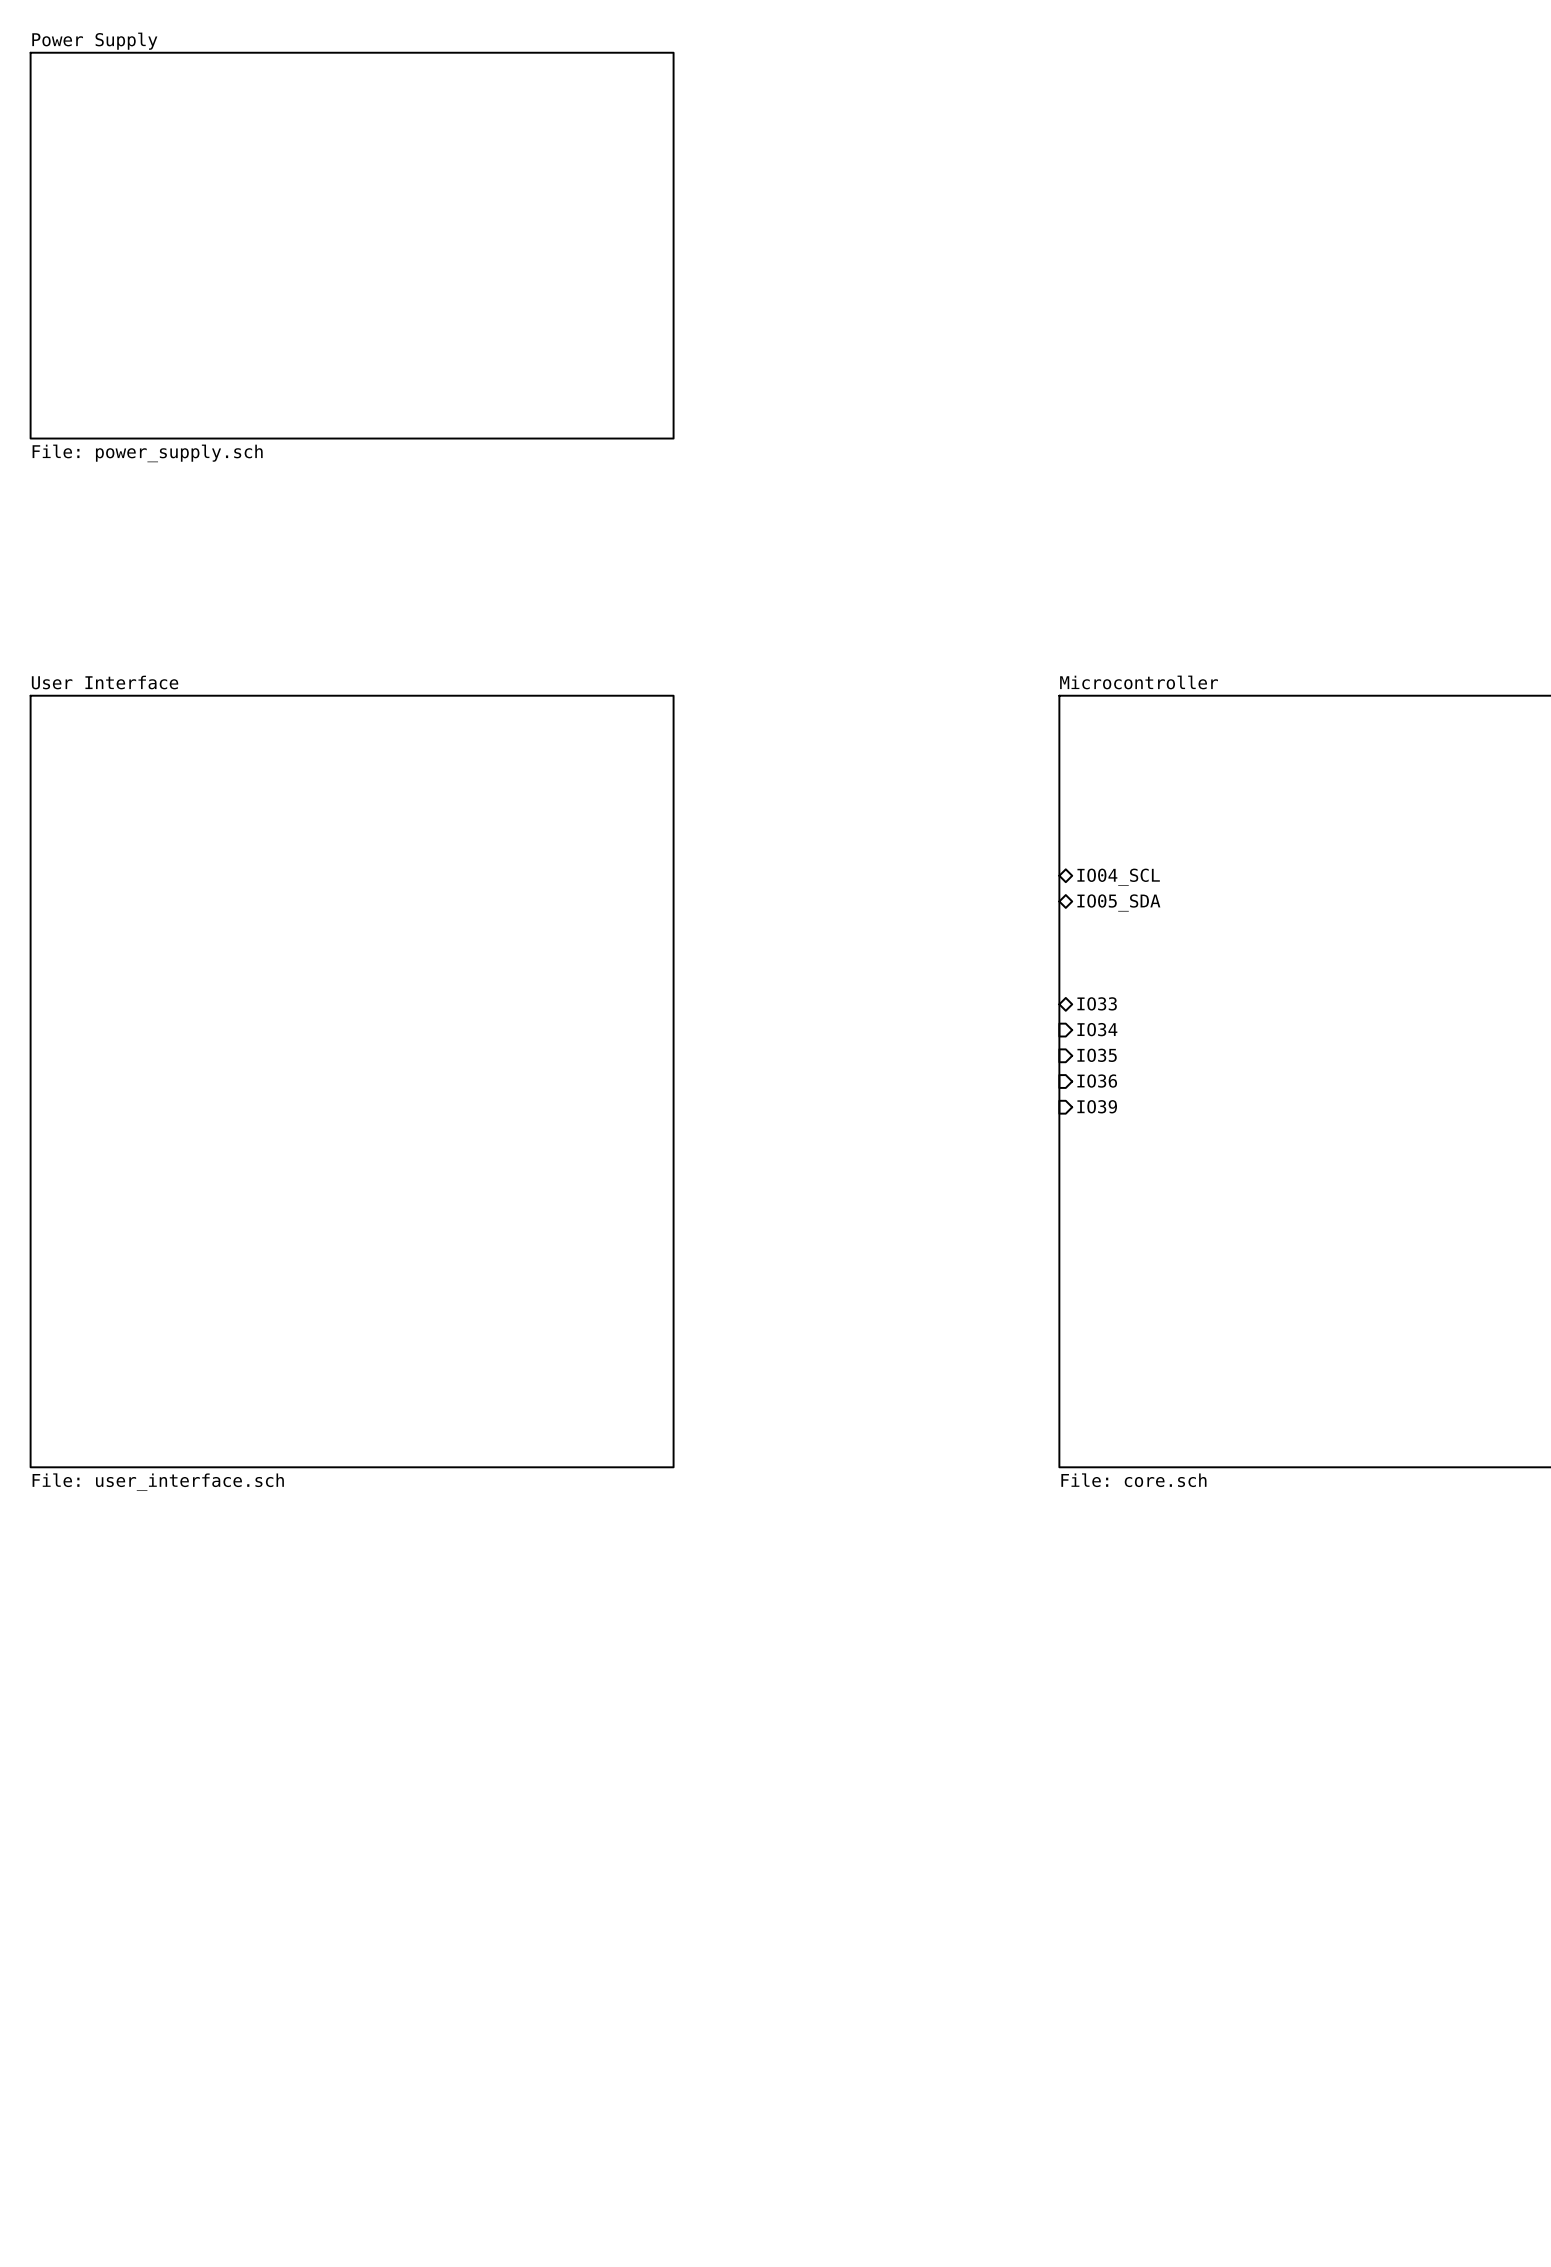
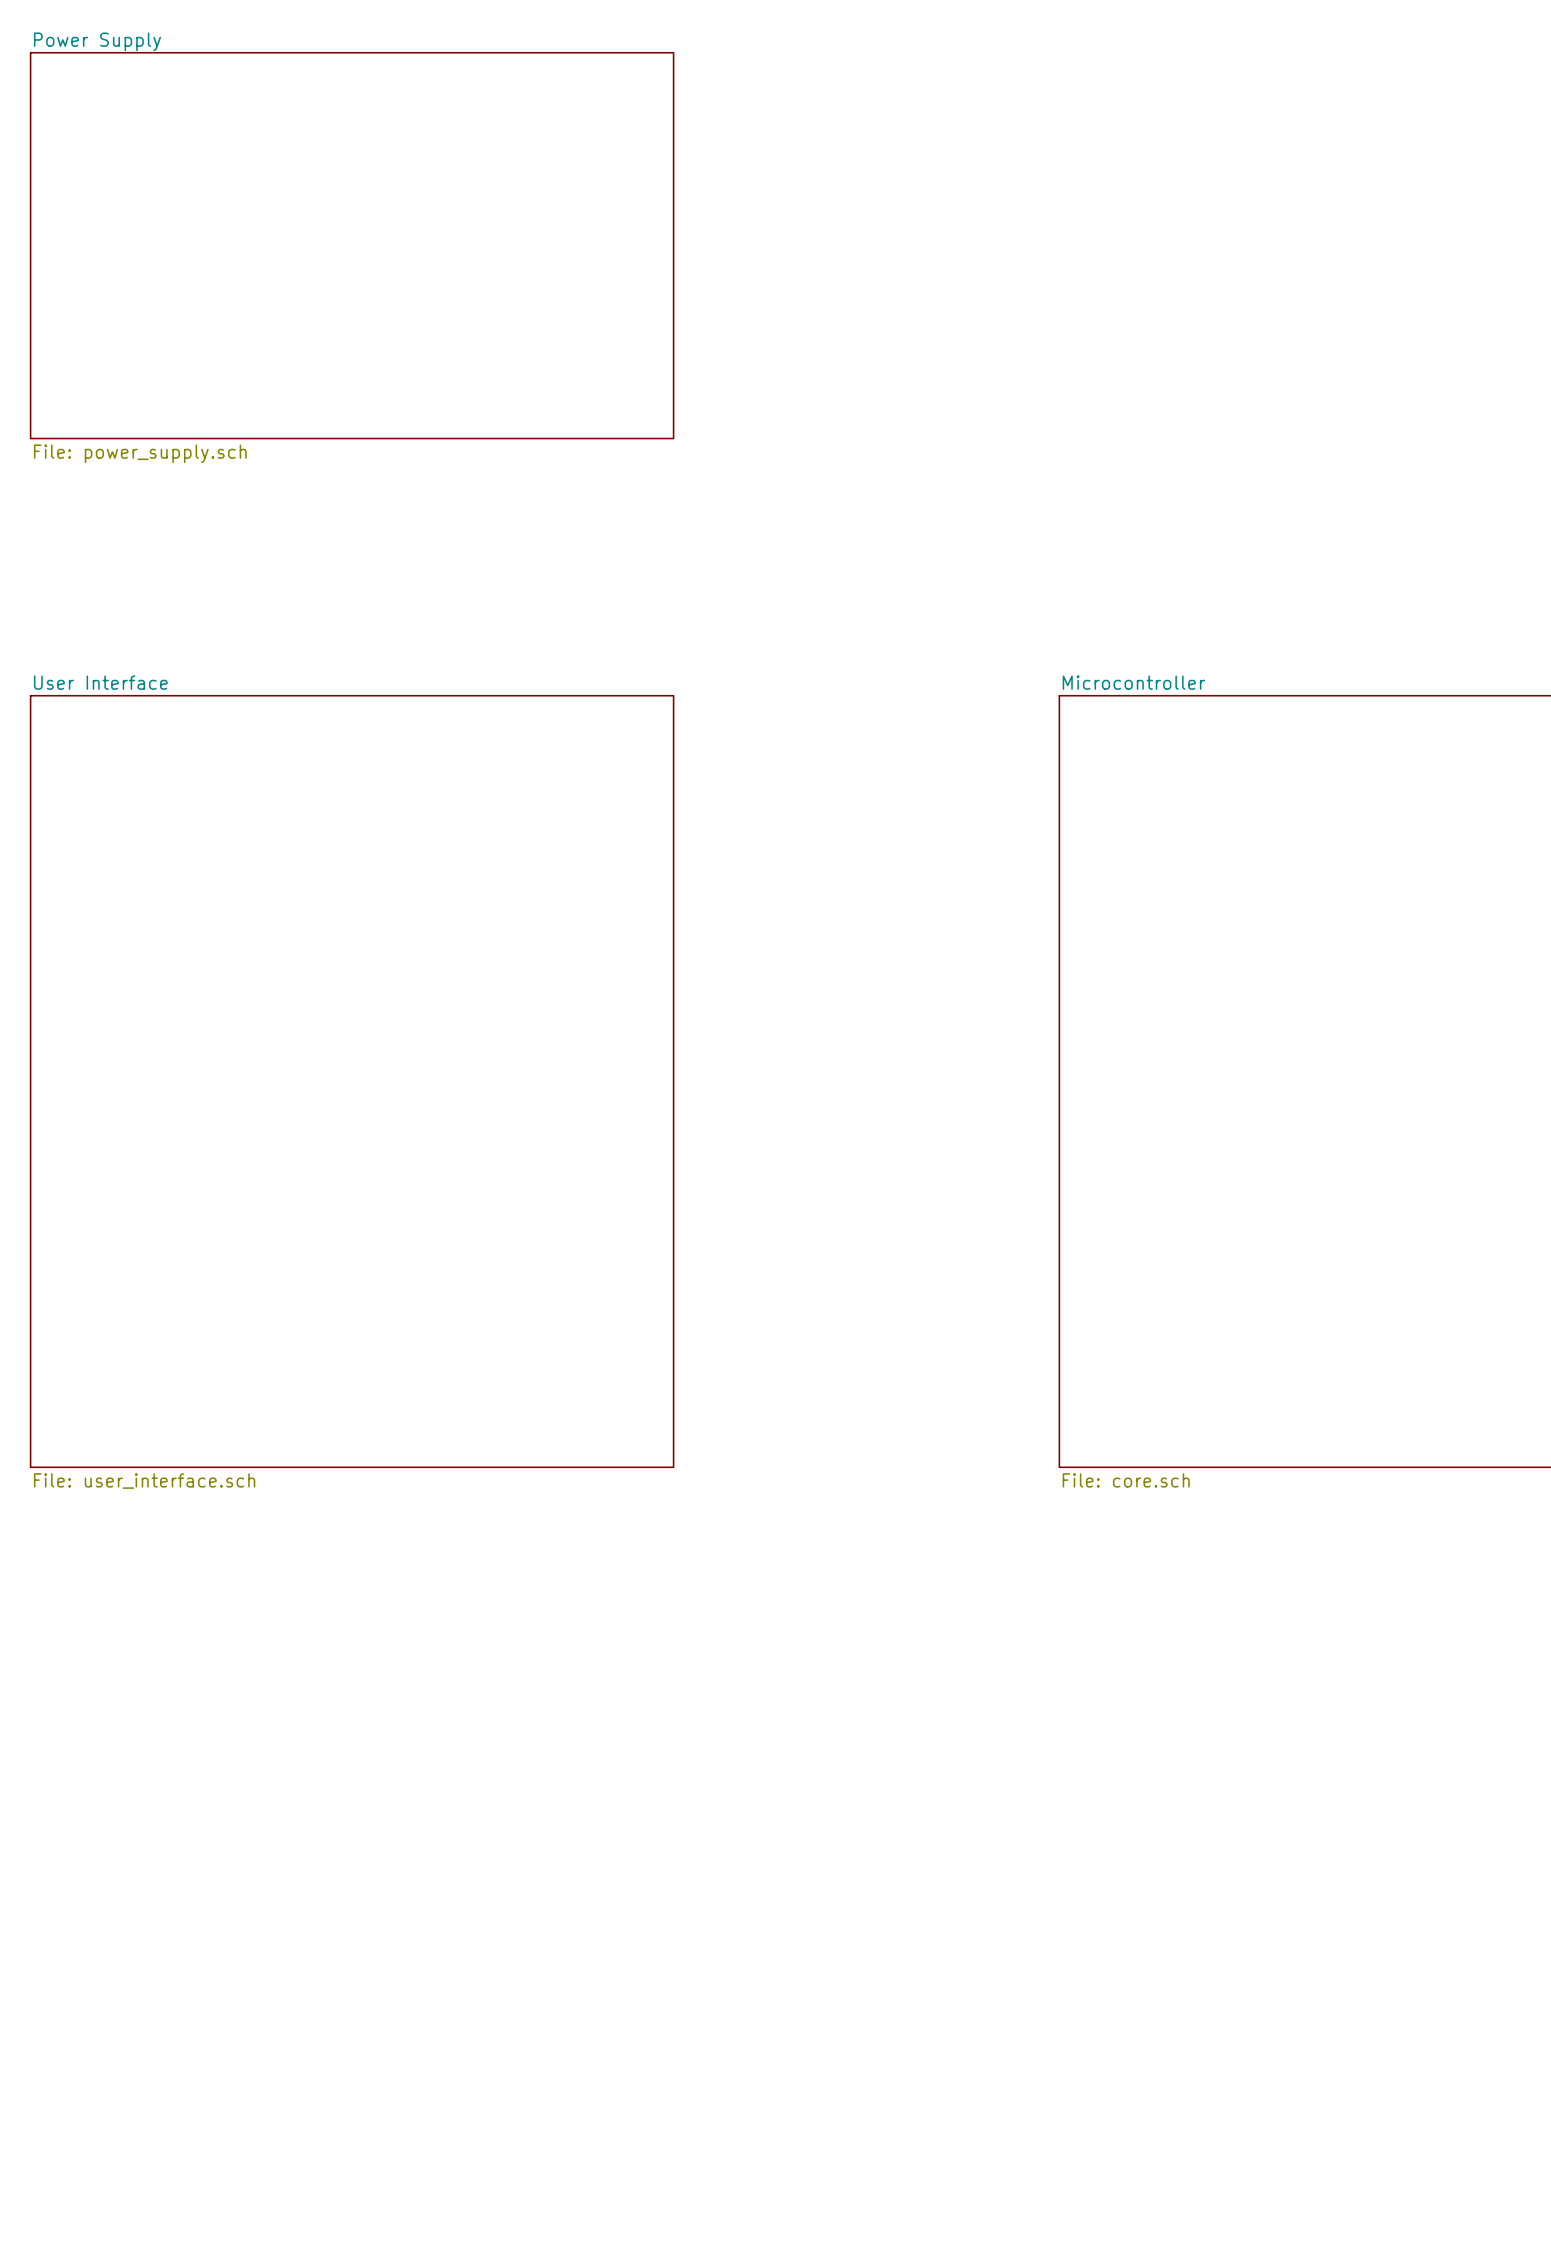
sheet pin: IO04_SCL (1118, 877) -> none
sheet pin: IO05_SDA (1118, 902) -> none
sheet pin: IO33 (1097, 1003) -> none
sheet pin: IO34 (1097, 1029) -> none
sheet pin: IO35 (1097, 1055) -> none
sheet pin: IO36 (1097, 1081) -> none
sheet pin: IO39 (1097, 1106) -> none

